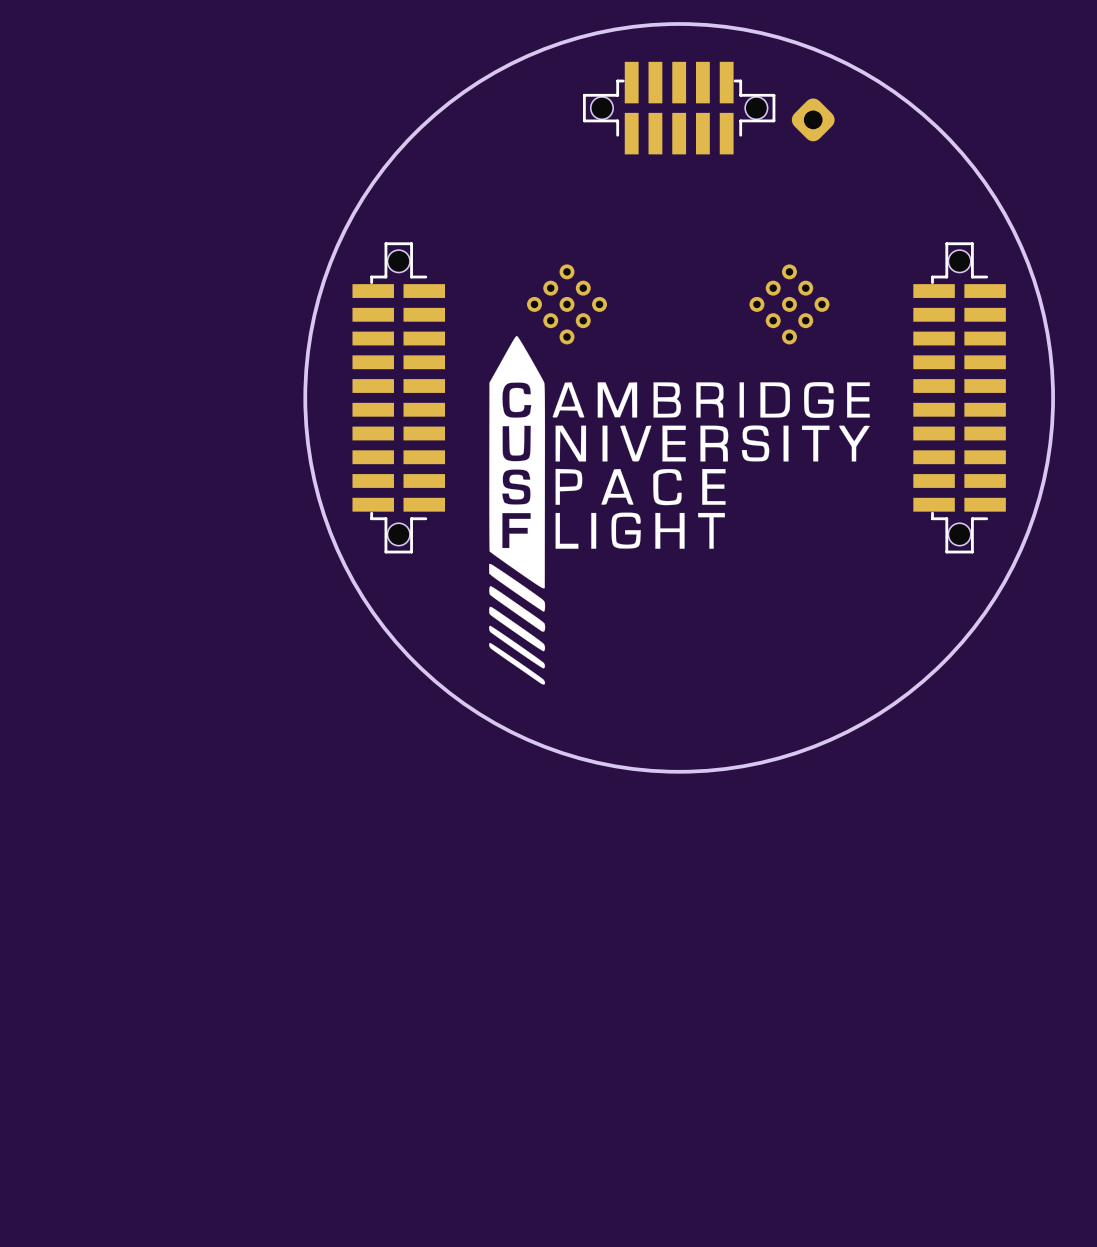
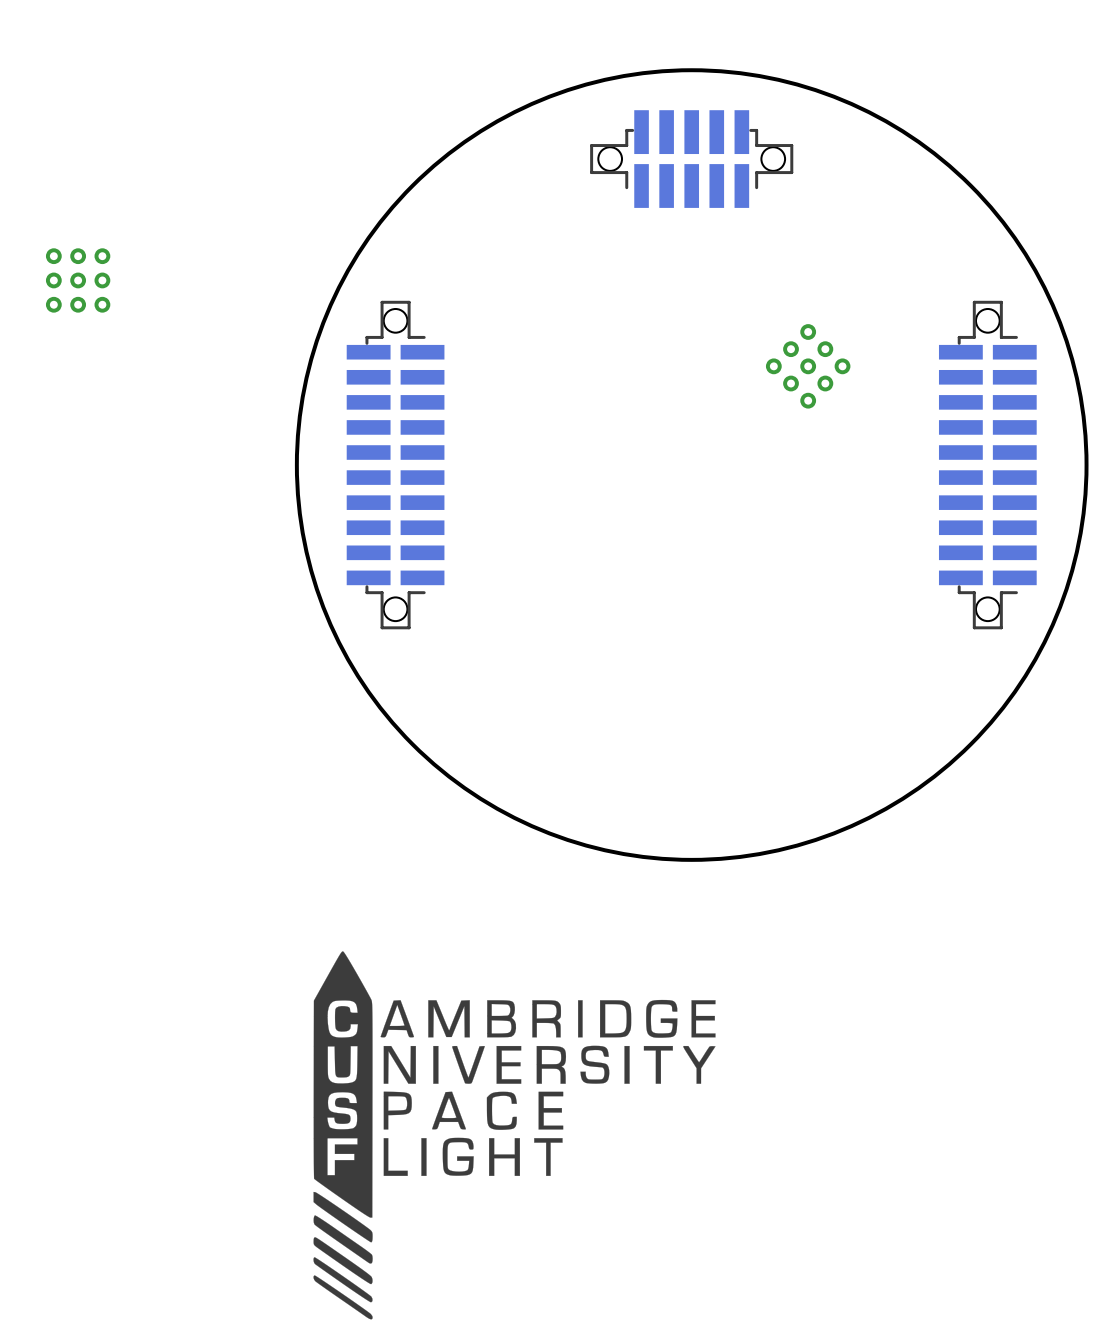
part: (813, 119) -> none
part: none -> (78, 280)
part: (567, 304) -> none
drawing: [489, 336, 870, 685] -> none
drawing: none -> [313, 951, 716, 1320]

